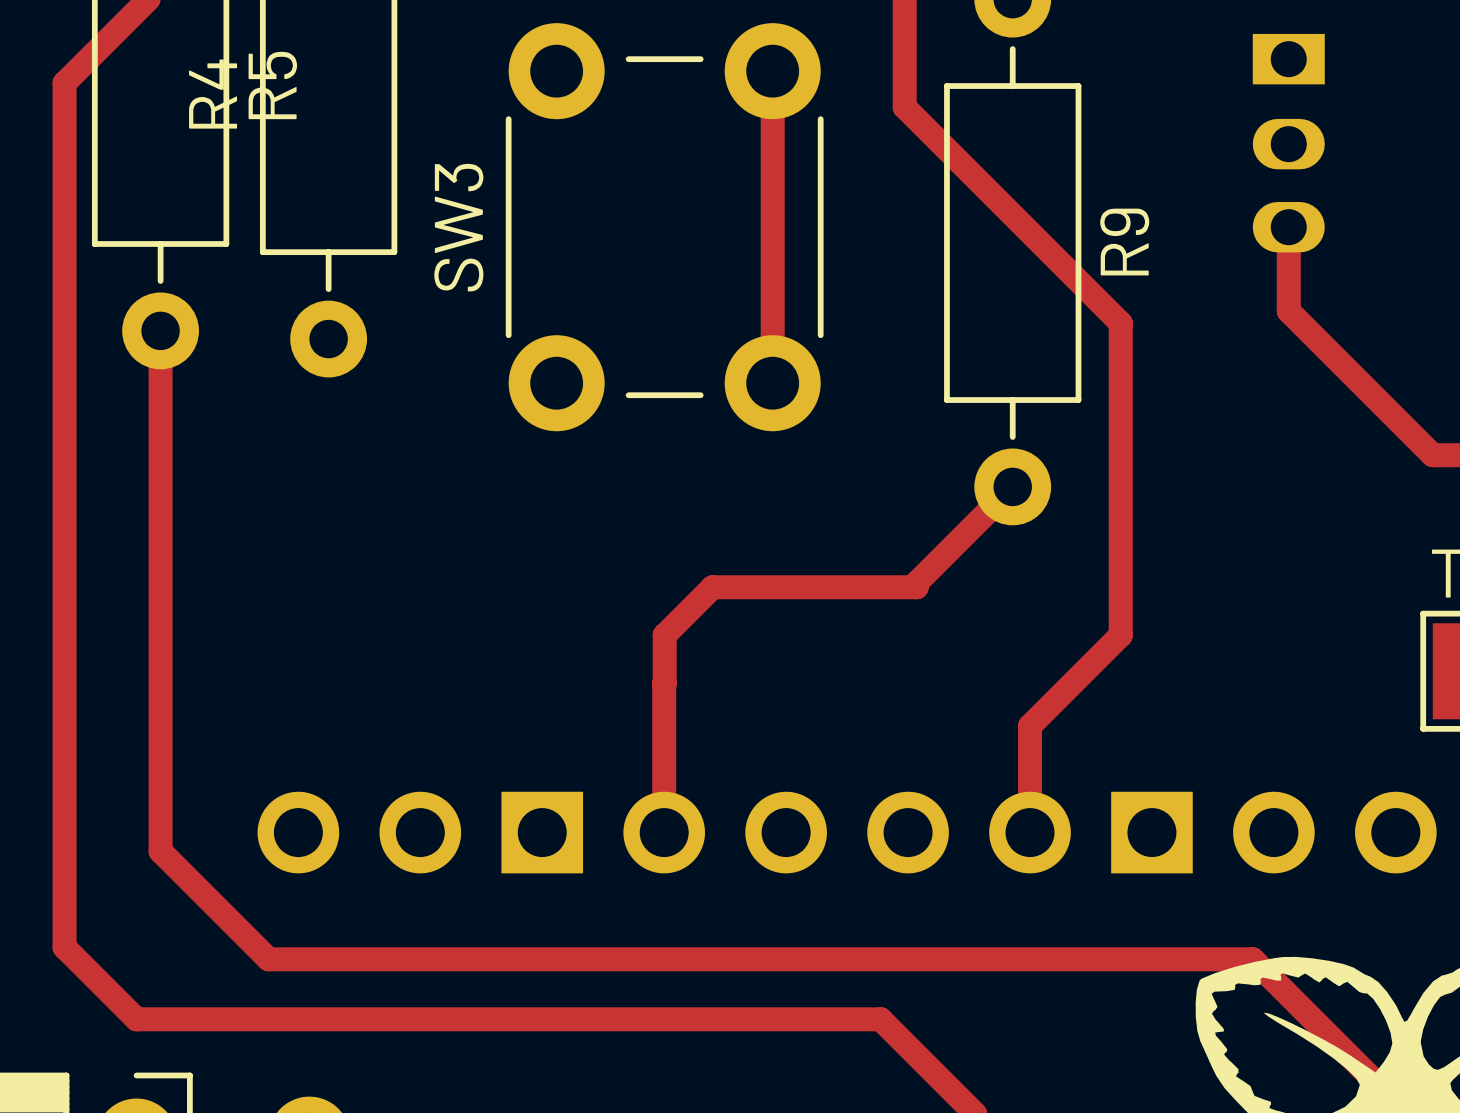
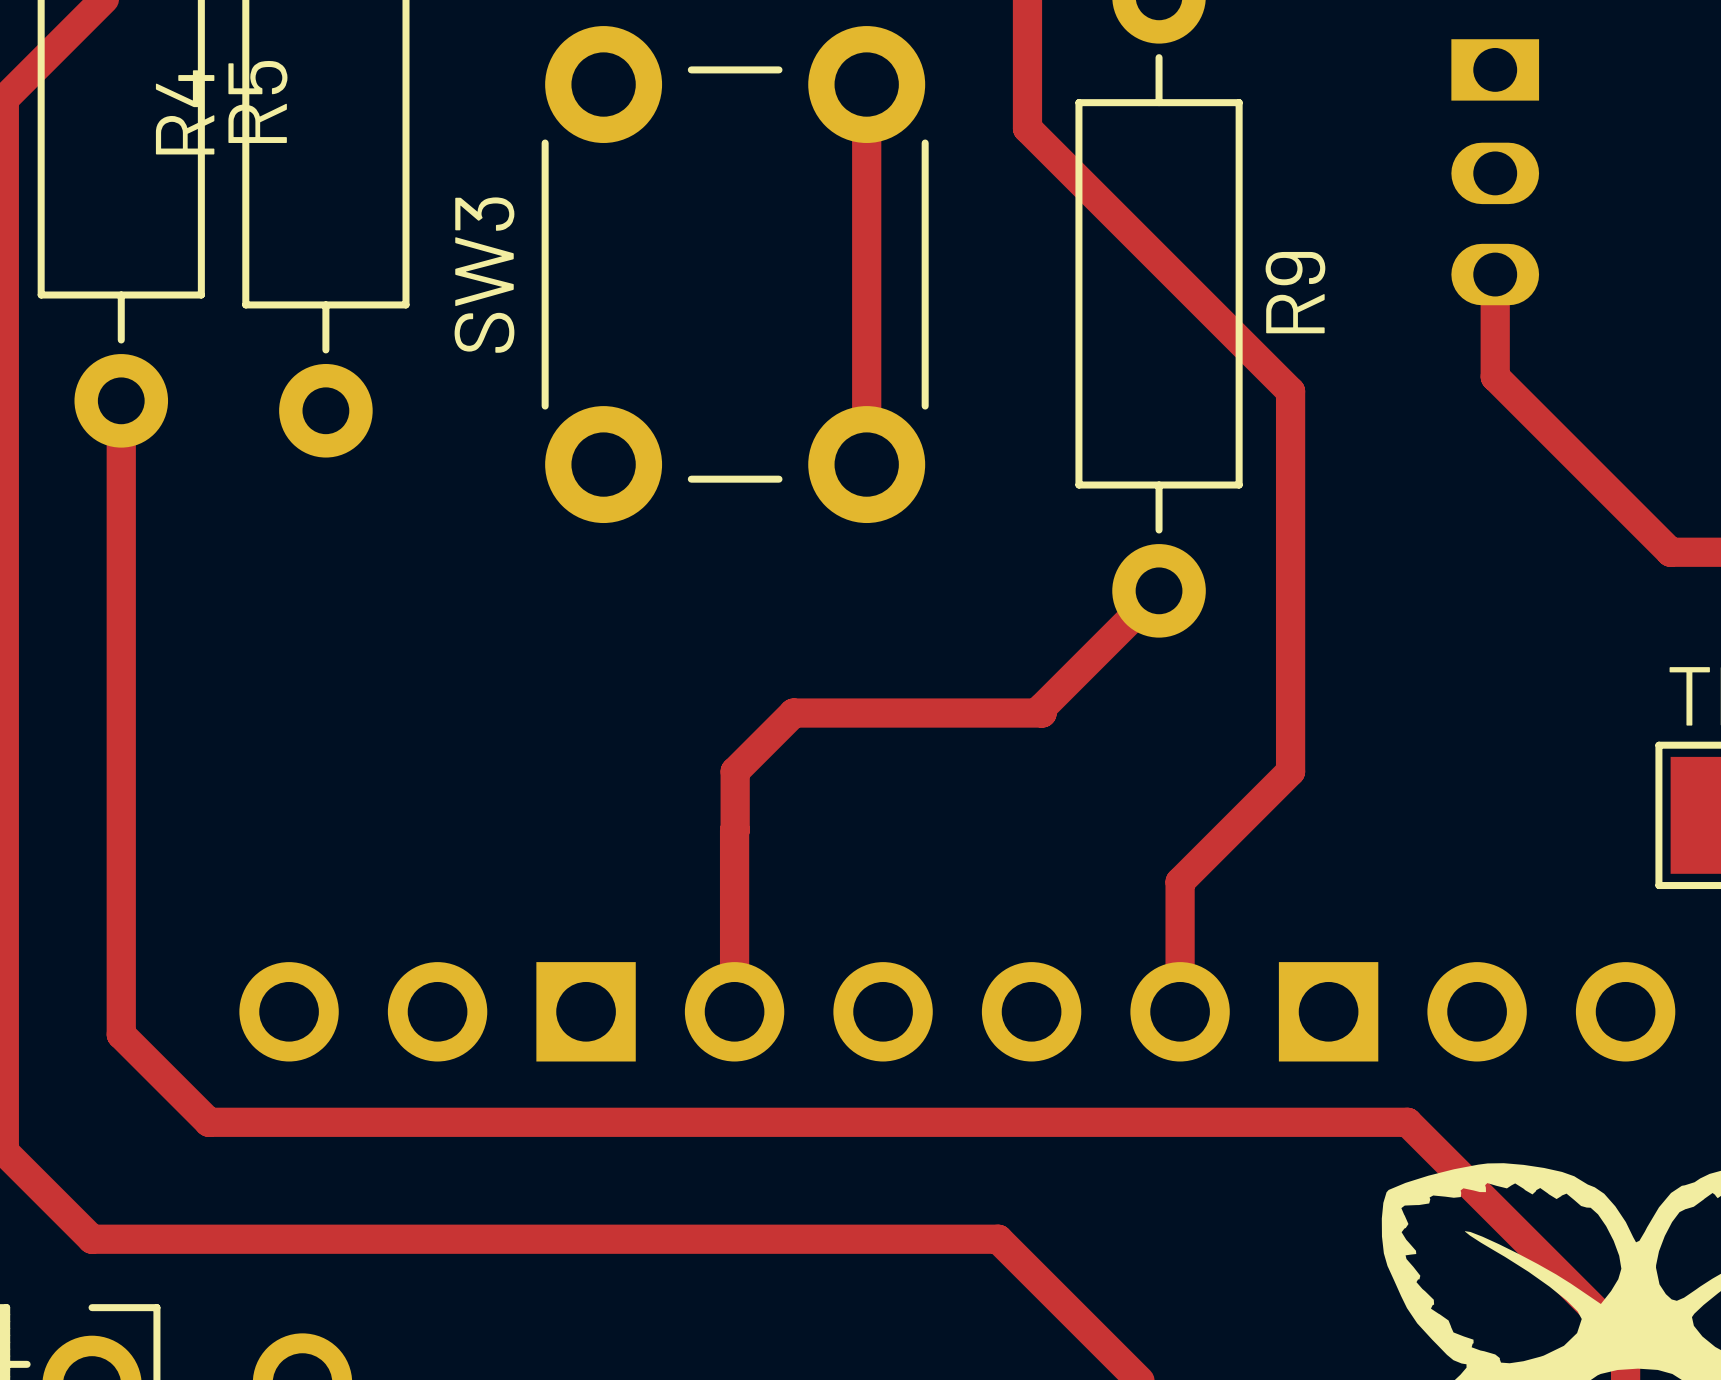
track: (232, 923) (268, 959) (1252, 959) -> (208, 1122) (1407, 1122) (1451, 1166)

